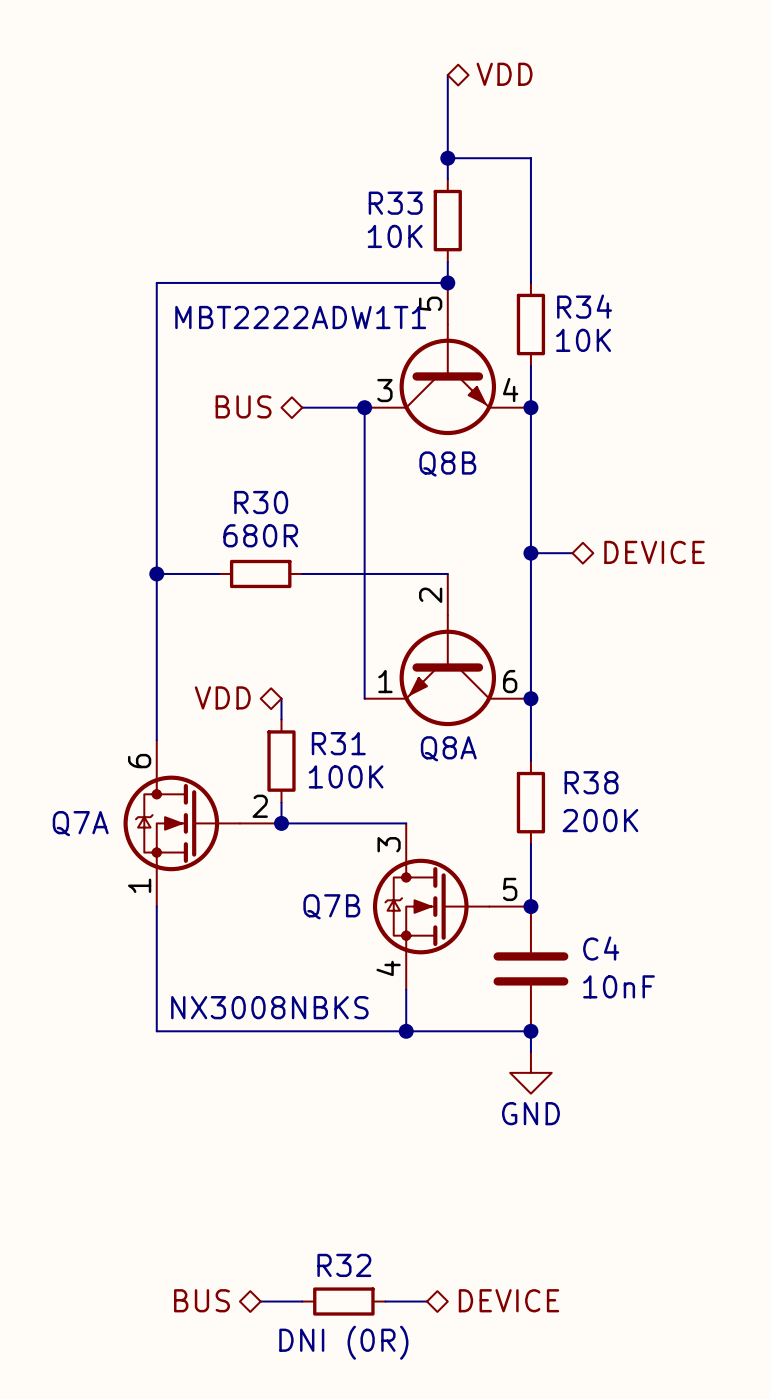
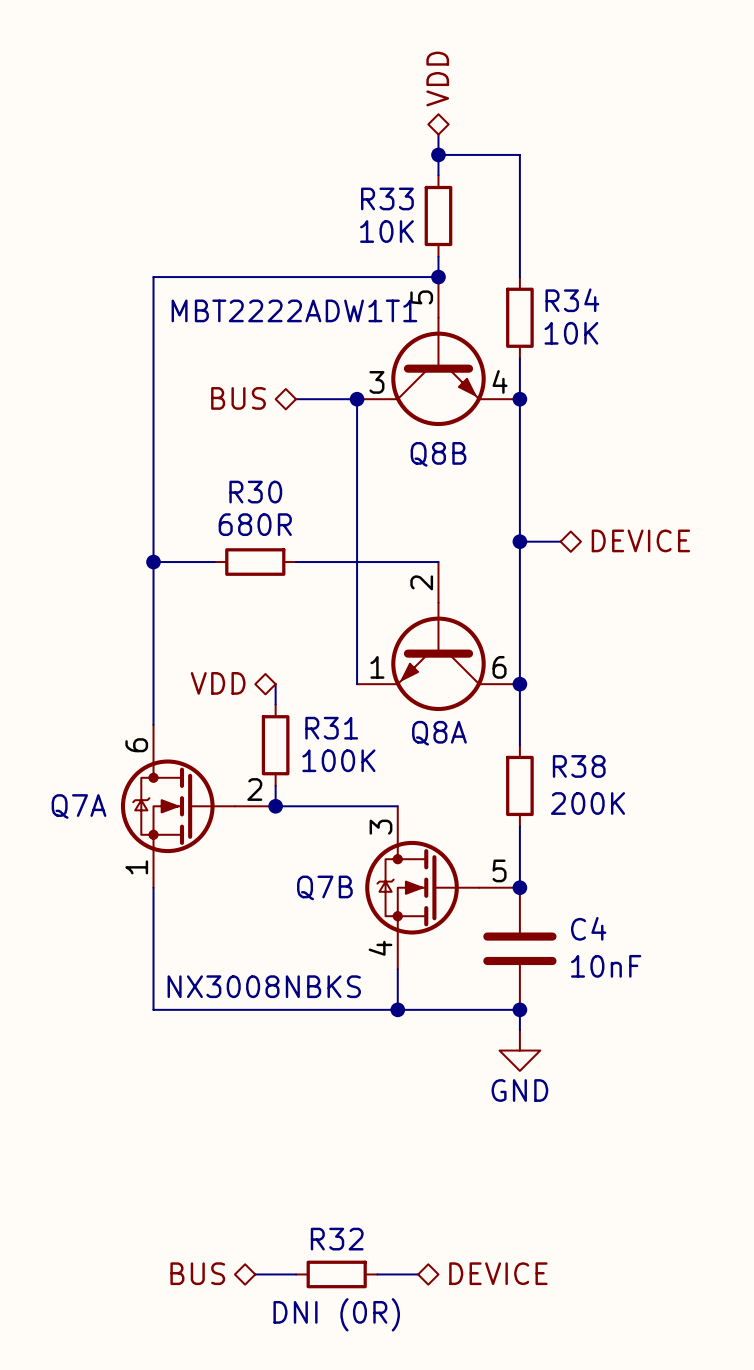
hierarchical label rotation: 0° (504, 74) -> 90° counterclockwise (437, 79)
wire: (447, 75) (447, 137) -> none

